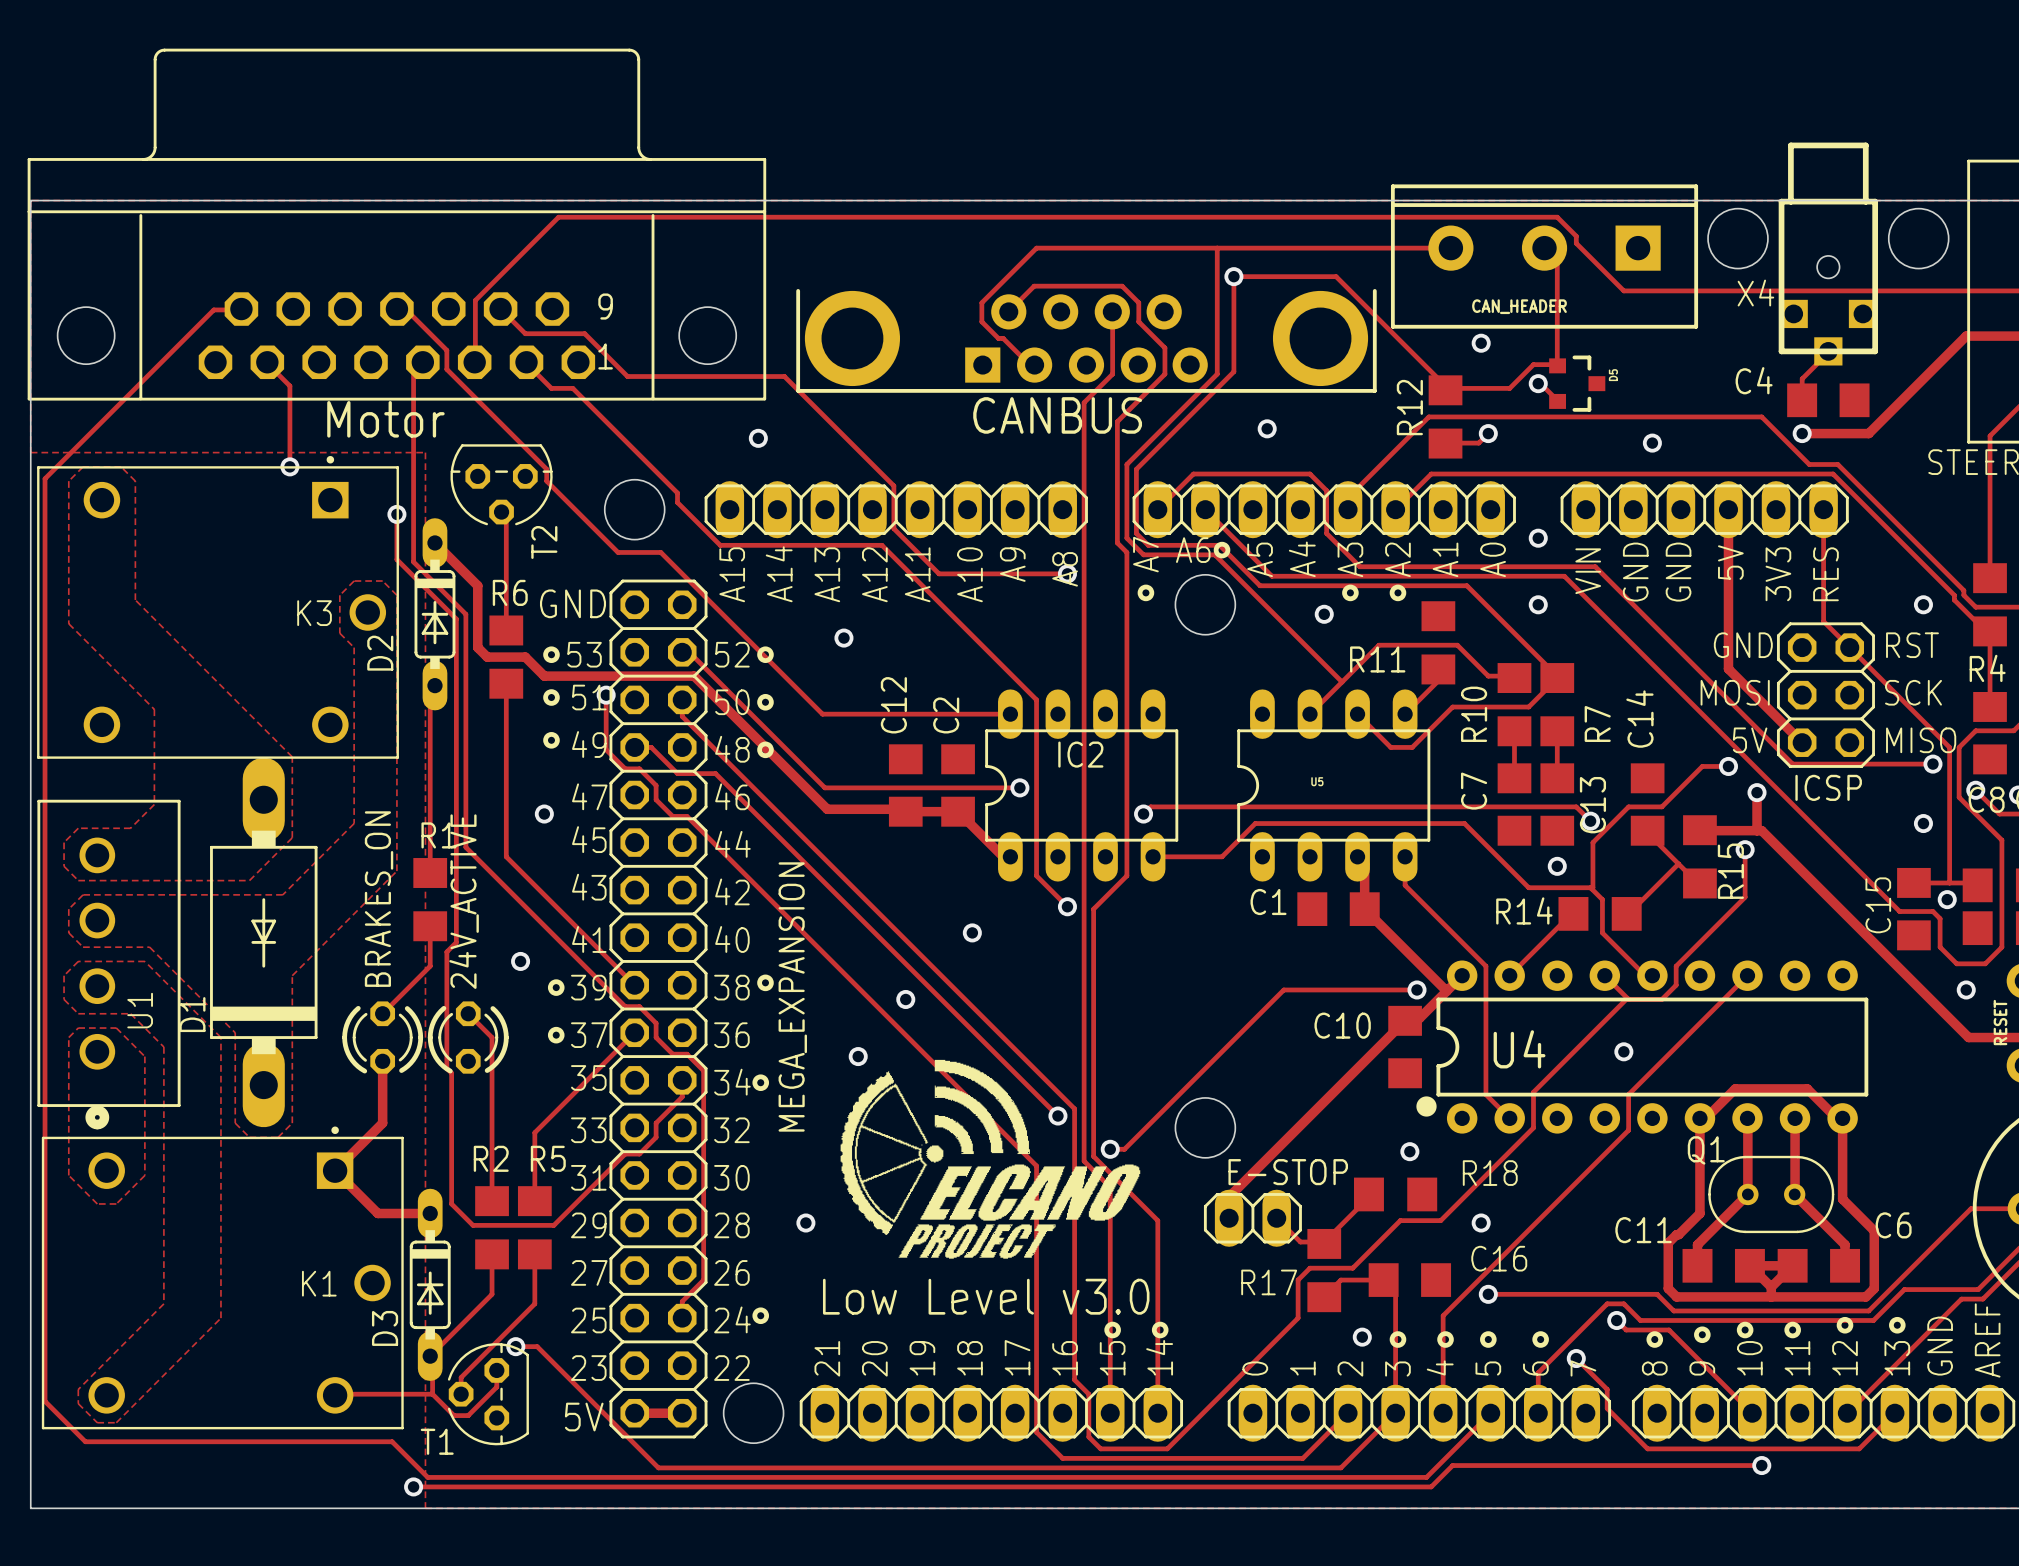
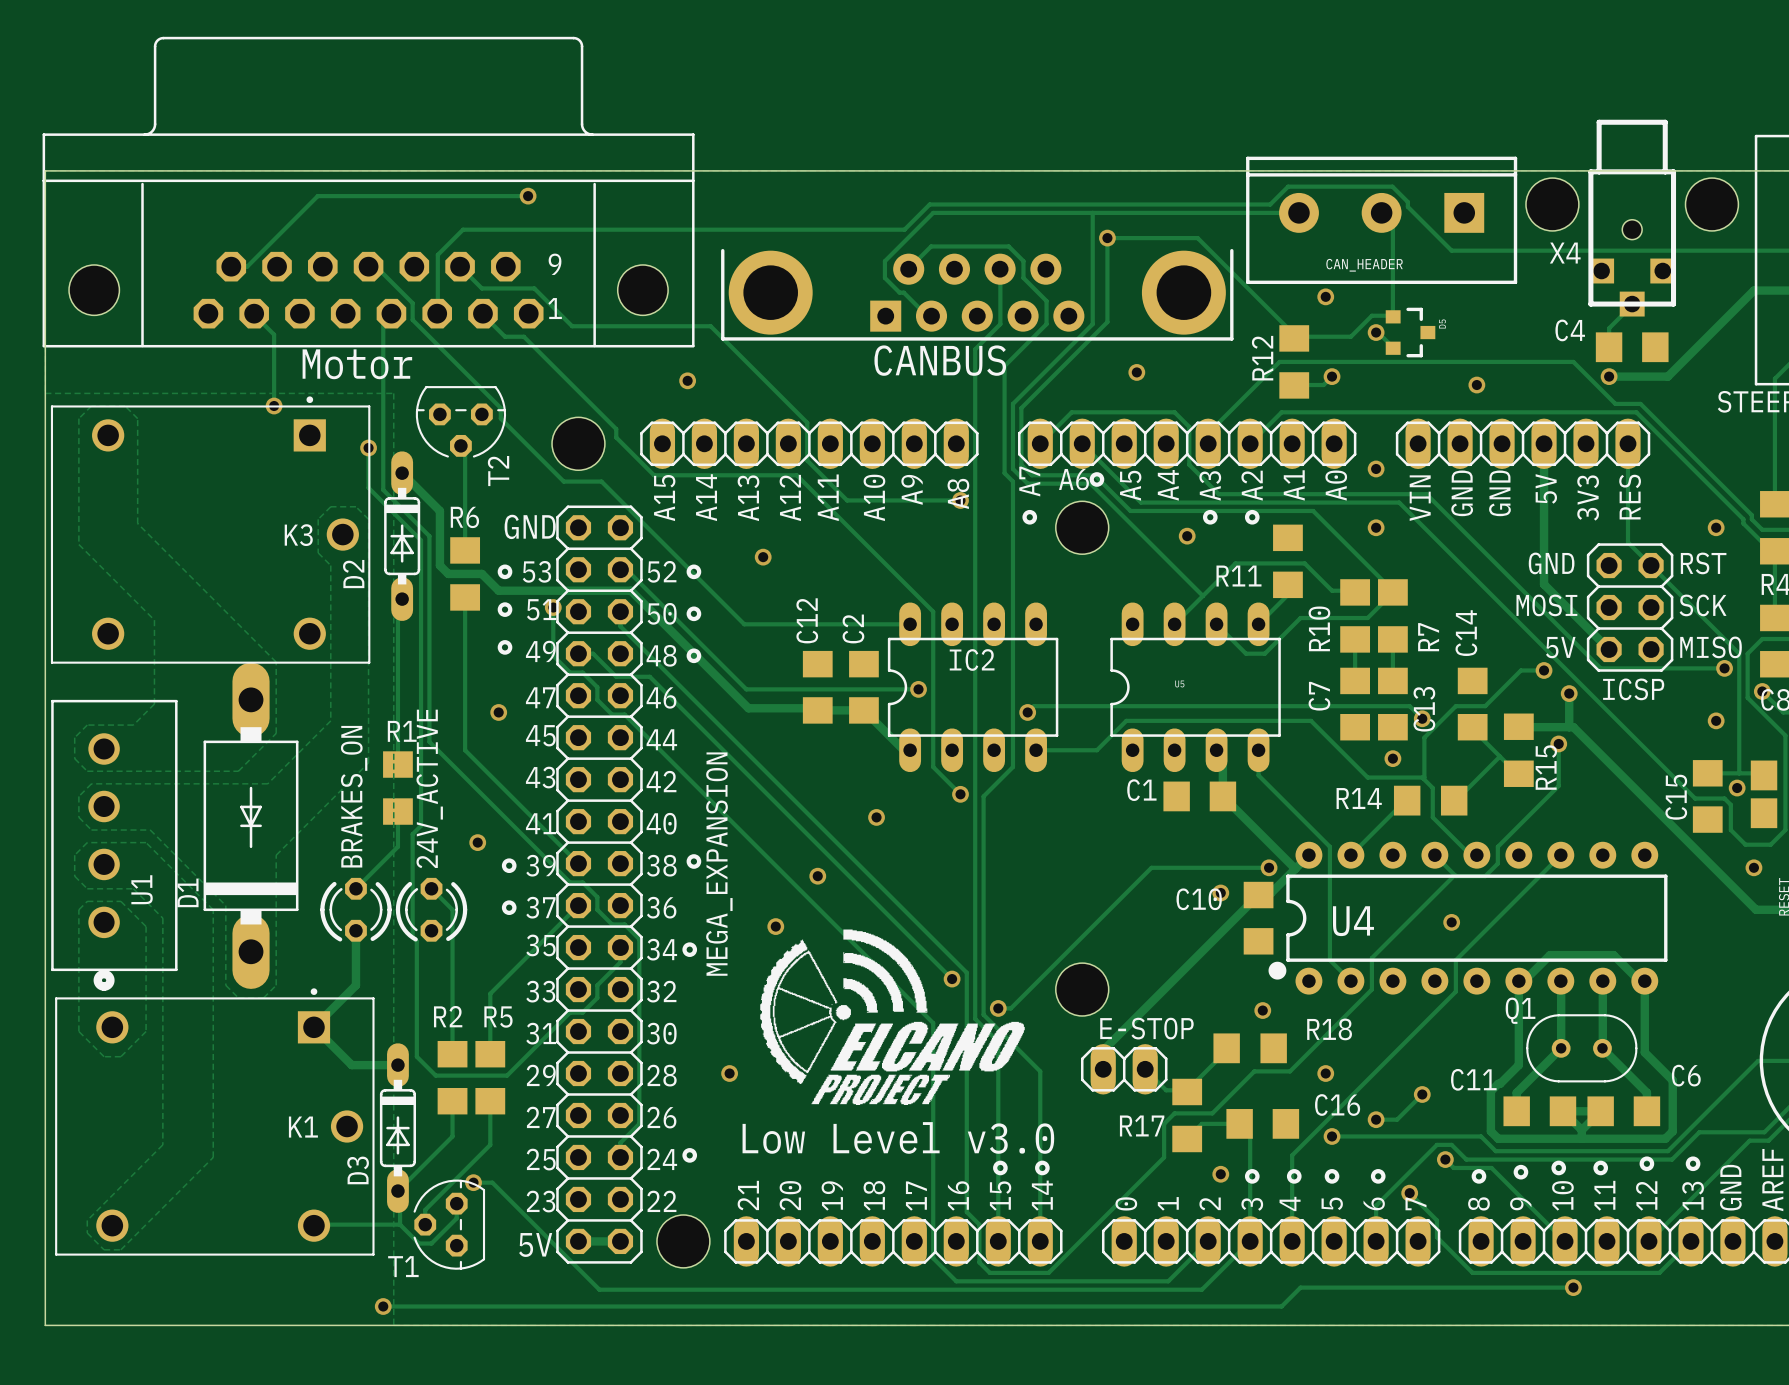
via: none -> (528, 196)
track: (1576, 243) (1576, 236) (1557, 217) (558, 217) (475, 300) -> (1409, 208) (1407, 202) (1392, 186) (1288, 186) (1270, 204) (929, 204) (904, 229) (463, 229) (437, 254) (437, 259)
track: (241, 309) (213, 309) (45, 478) (45, 1401) (85, 1441) (392, 1441) (427, 1477) (1426, 1477) (1490, 1413) -> (231, 266) (247, 266) (317, 196) (528, 196)
via: none -> (1220, 892)
track: none -> (1422, 1094) (1397, 1119) (1376, 1119)
via: none -> (1422, 1094)
via: none -> (1376, 1119)

